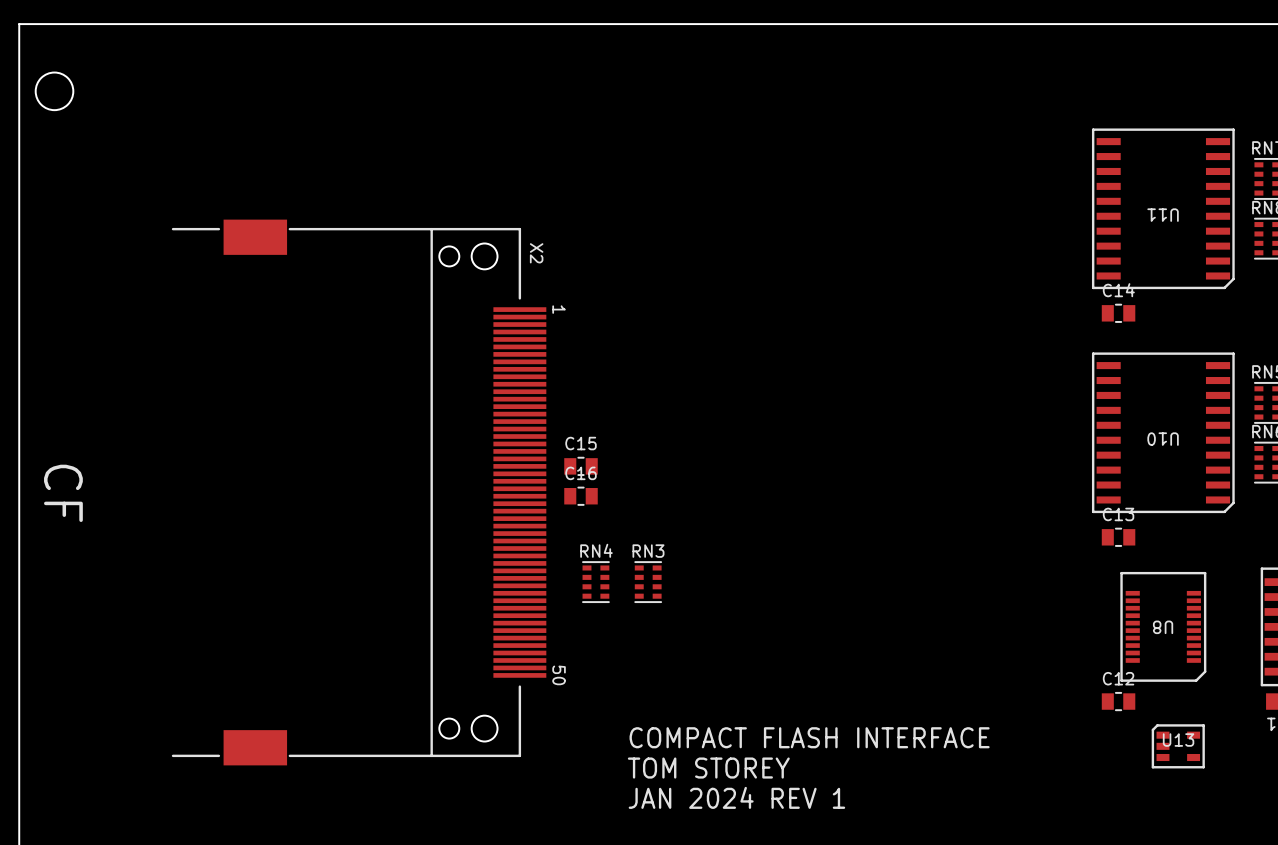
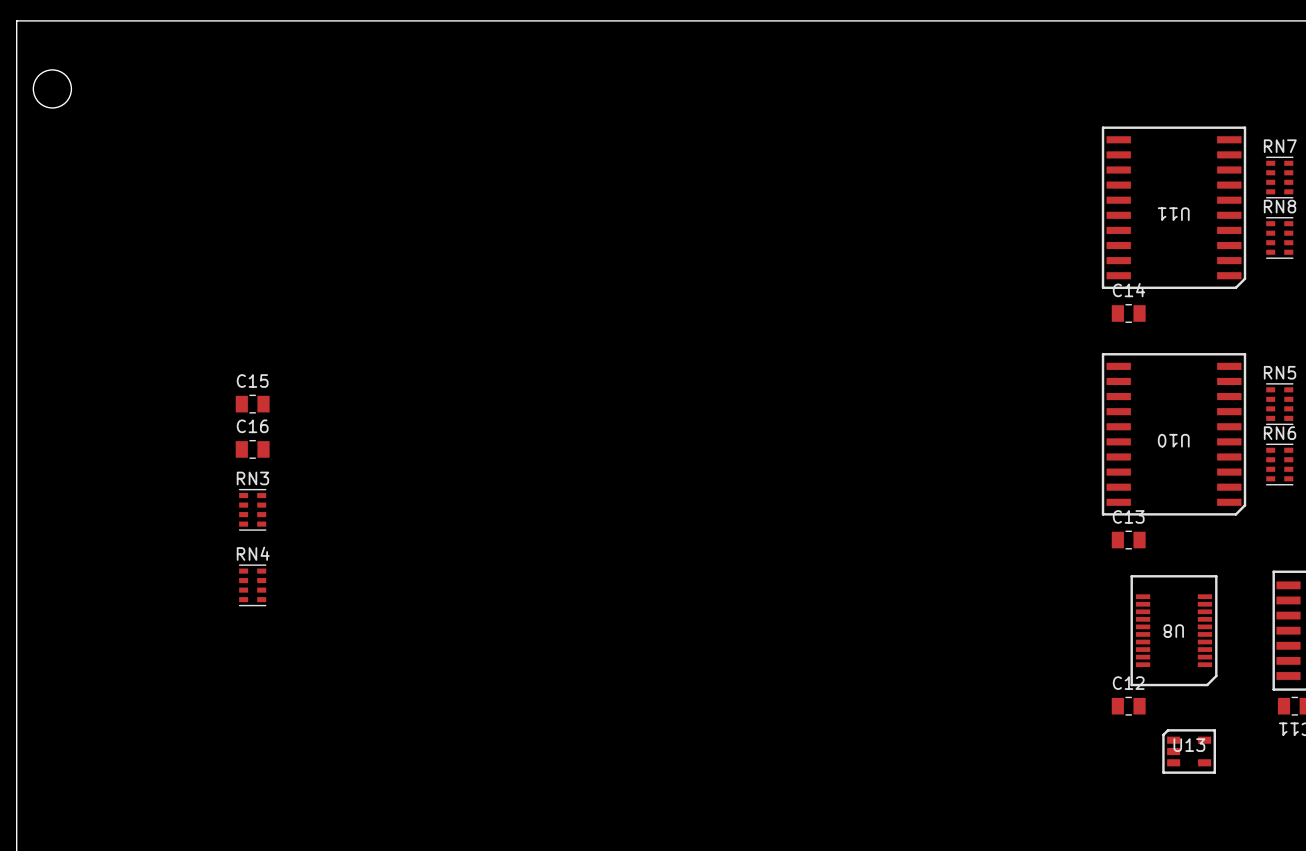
C15 position: (581, 466) -> (252, 404)
X2: (359, 492) -> none
text: CF (63, 493) -> none
C16 position: (581, 496) -> (252, 449)
RN4 position: (595, 582) -> (252, 585)
RN3 position: (648, 582) -> (252, 509)
text: COMPACT FLASH INTERFACE (809, 737) -> none
text: TOM STOREY (708, 768) -> none
text: JAN 2024 REV 1 (736, 797) -> none

